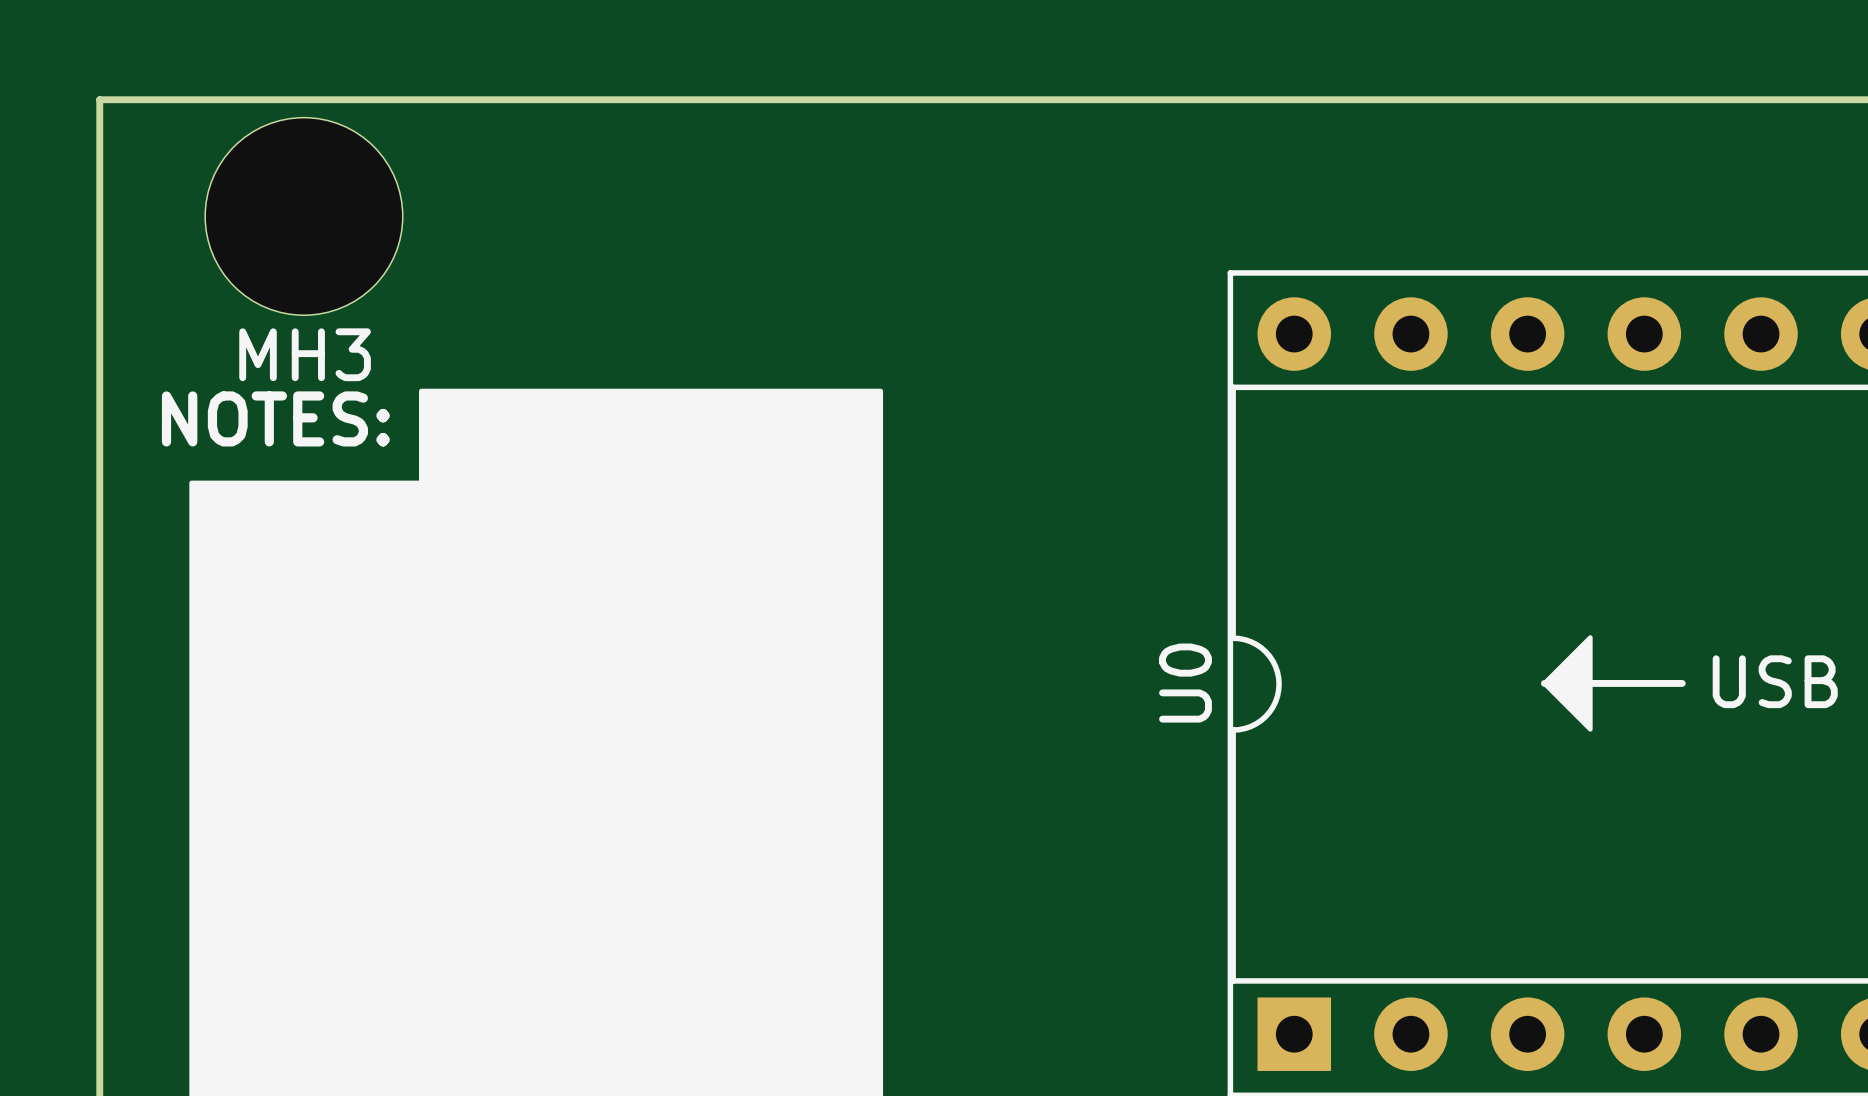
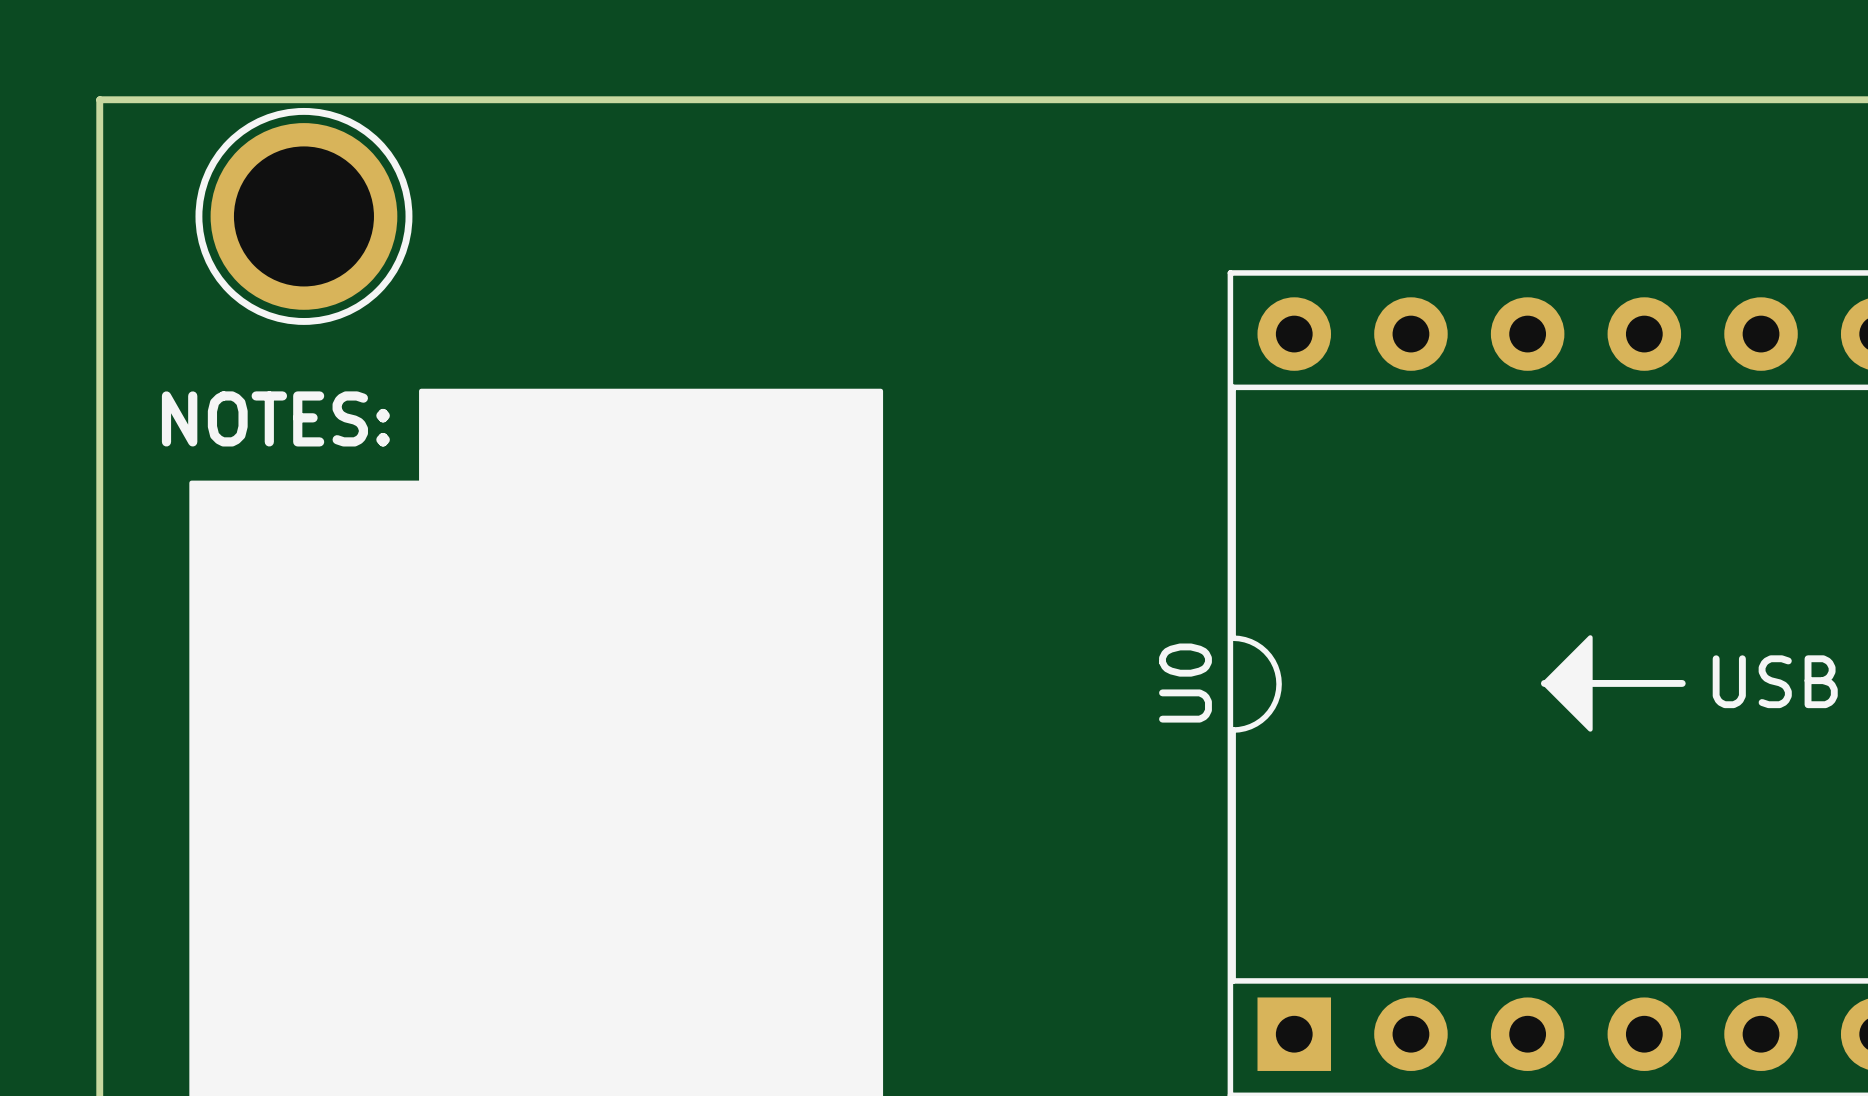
MH3: (303, 216) -> none
part: none -> (303, 216)

